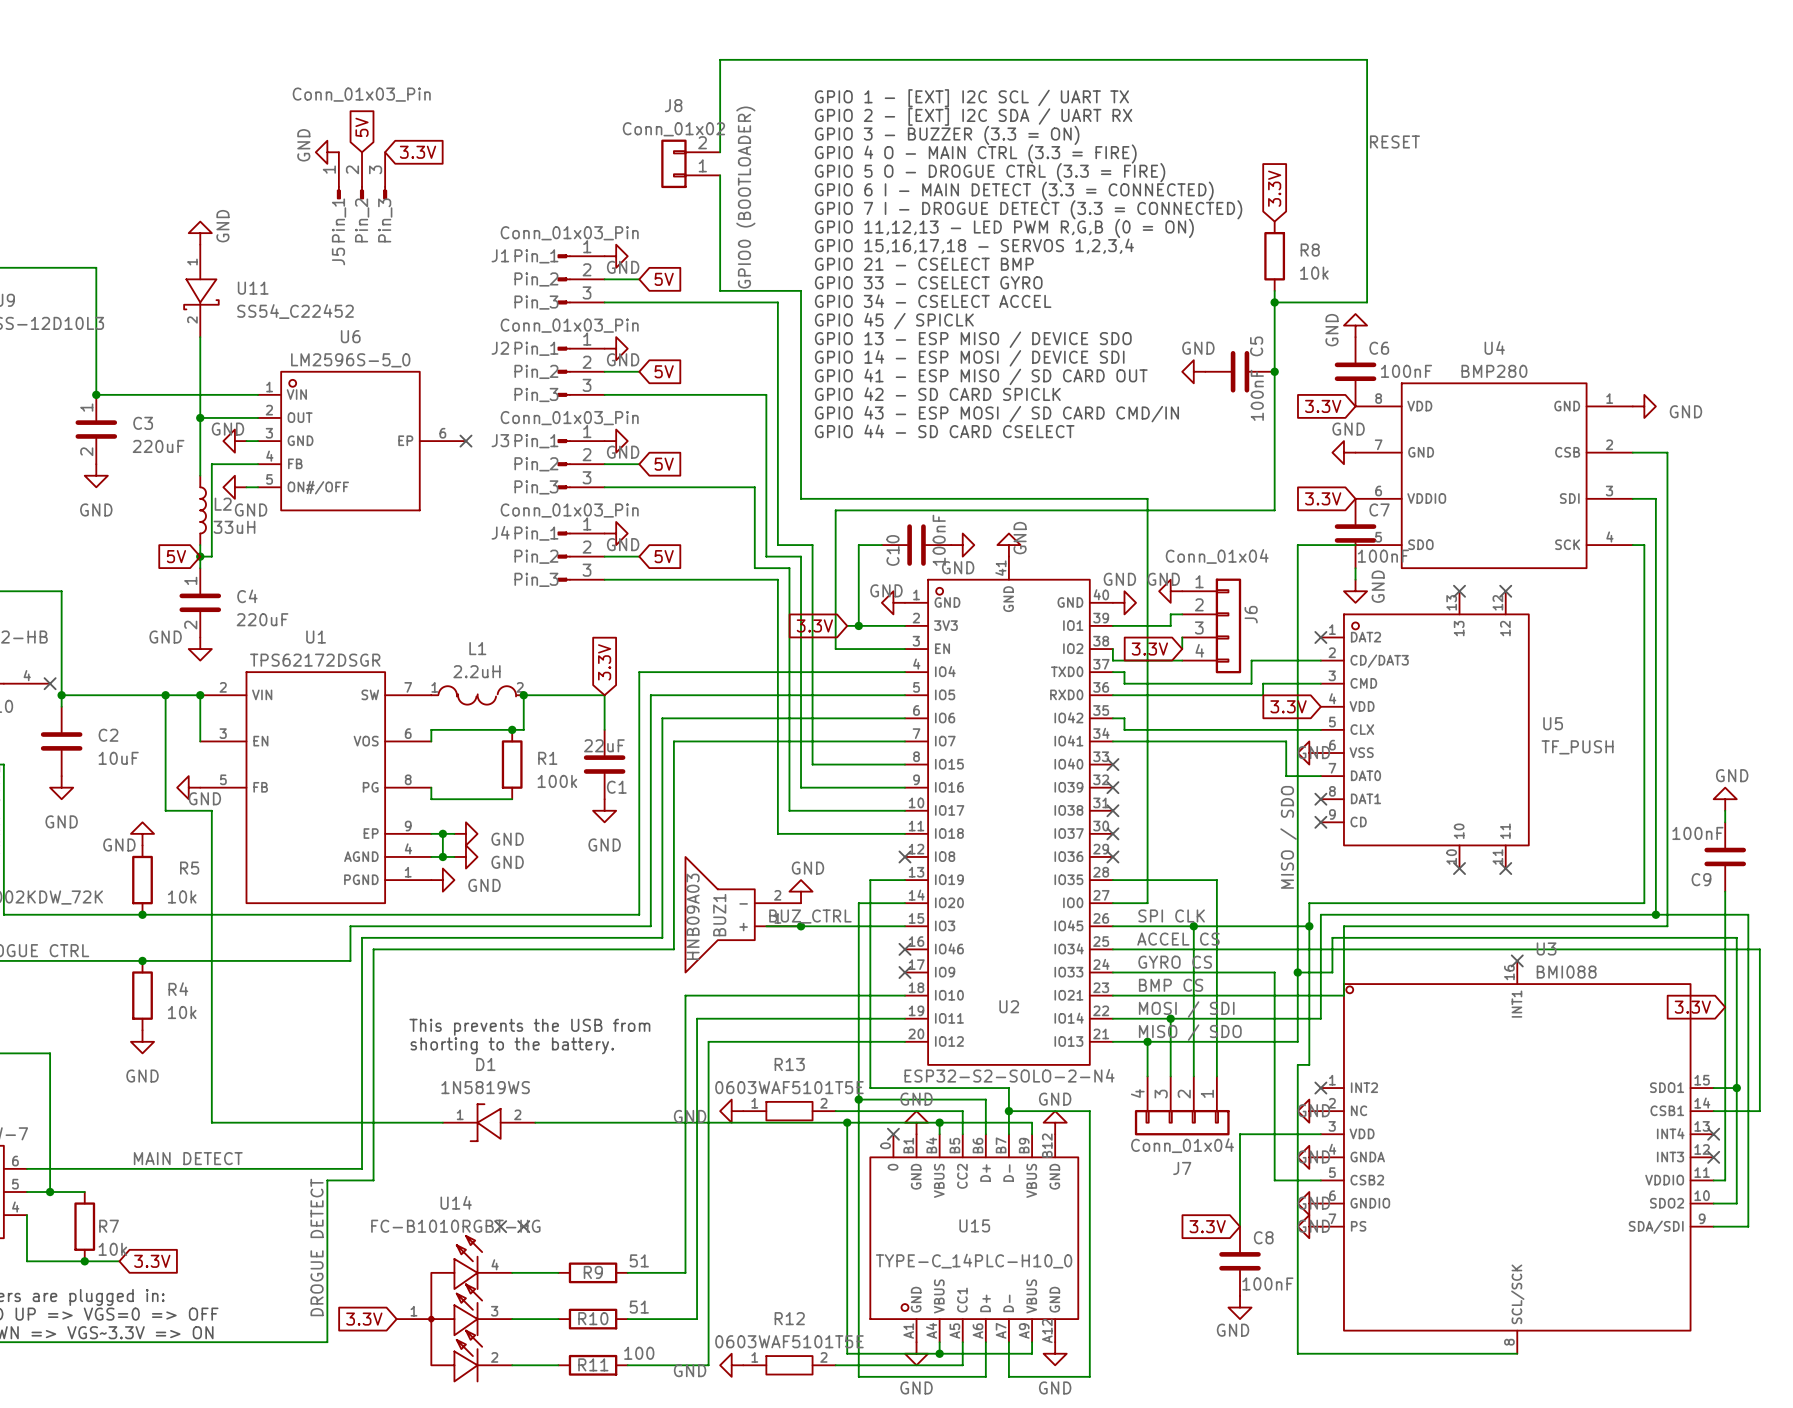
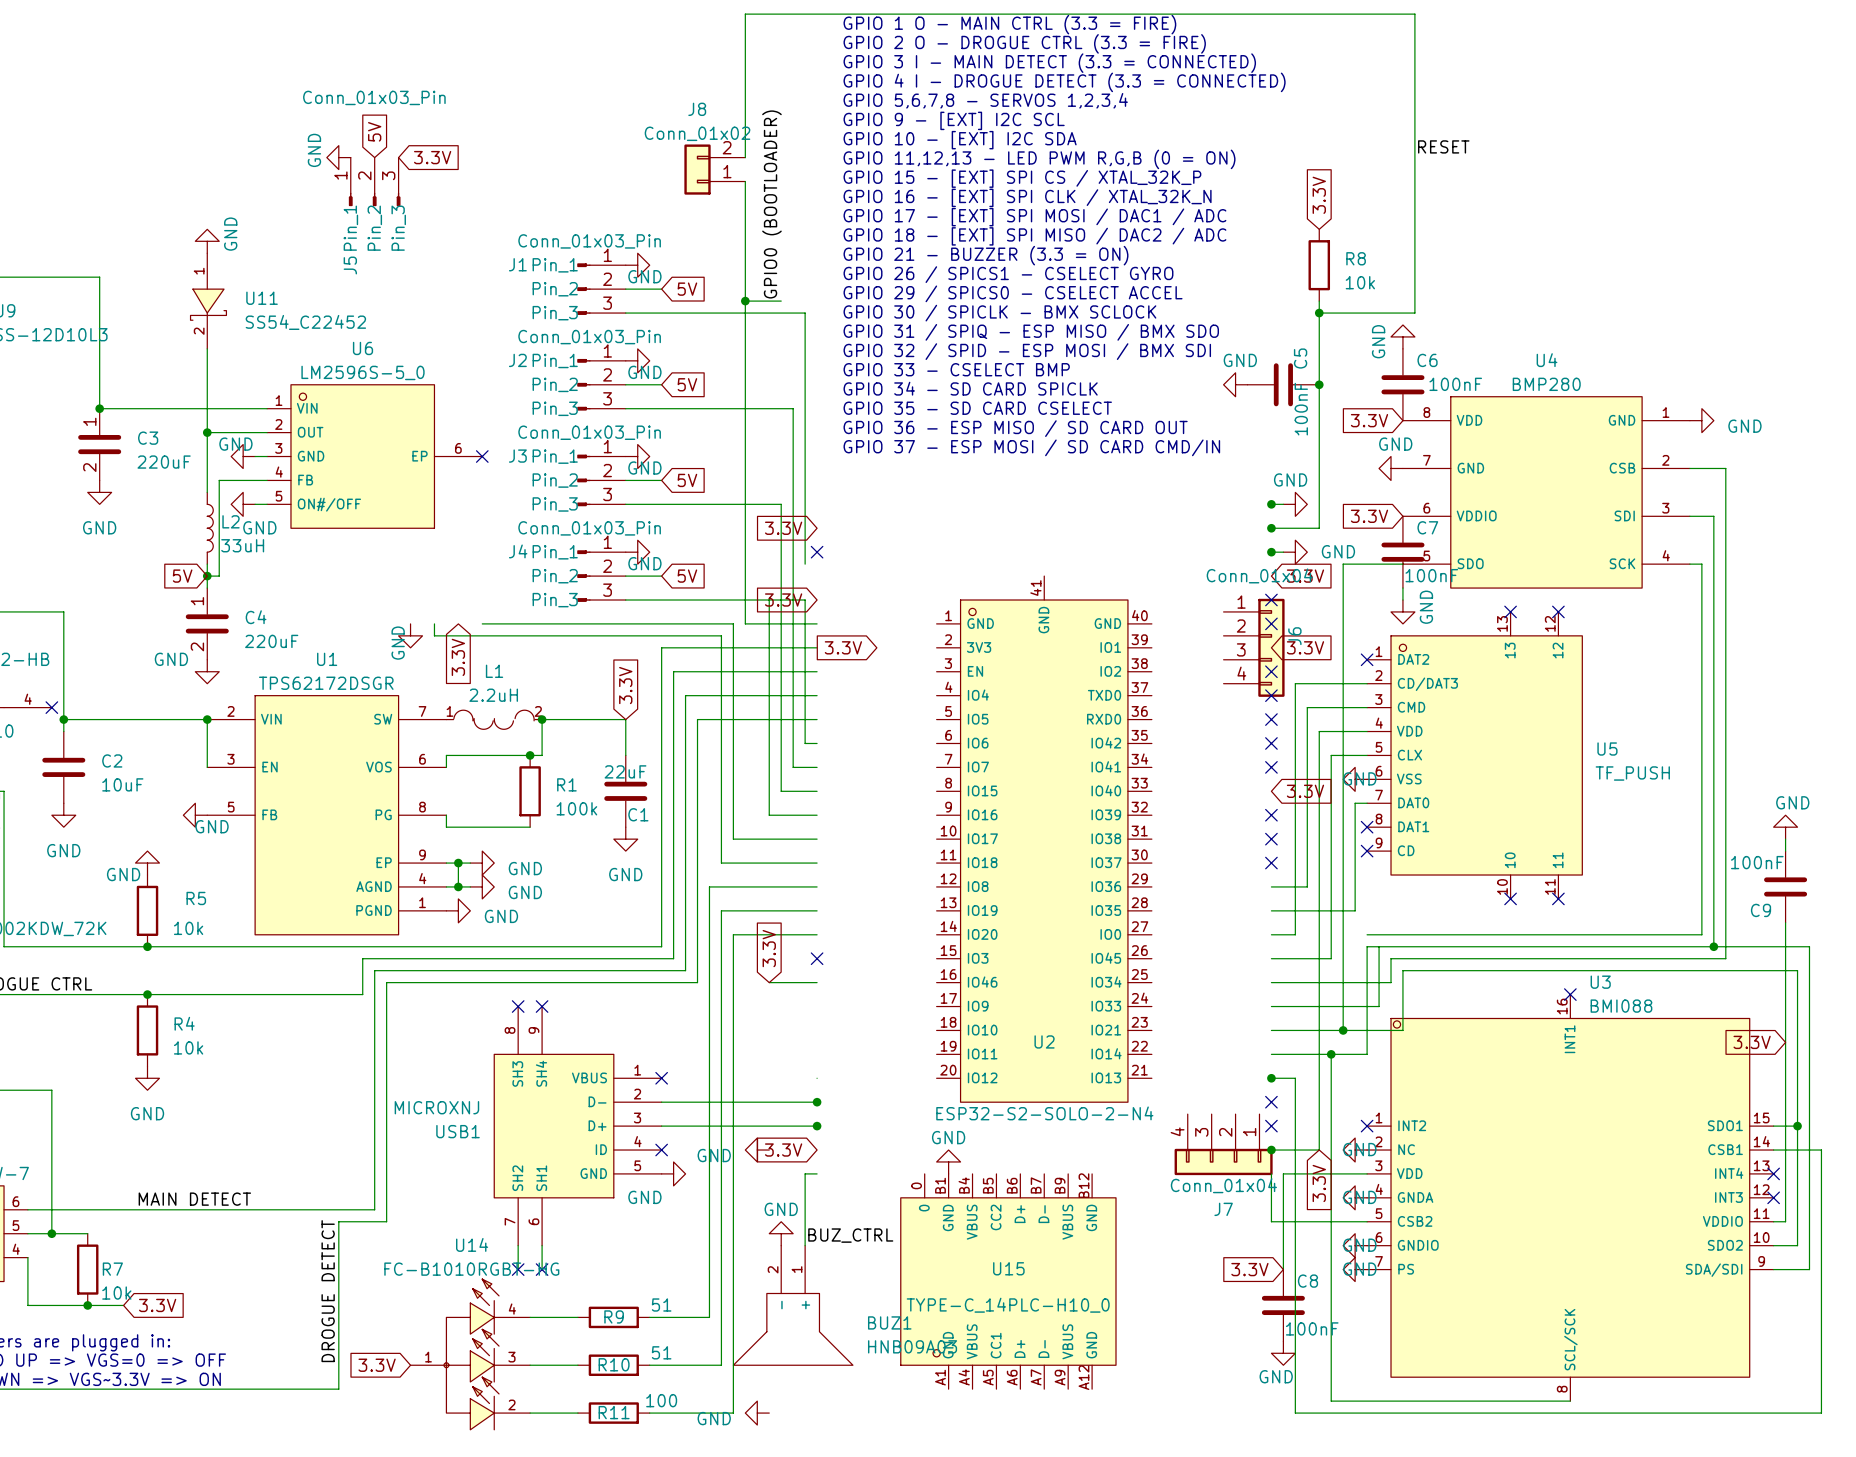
text: none -> GPIO 1 O - MAIN CTRL (3.3 = FIRE) (1009, 24)
text: none -> GPIO 2 O - DROGUE CTRL (3.3 = FIRE) (1024, 43)
wire: (720, 59) (1367, 59) -> (745, 61) (745, 14) (1414, 14) (1414, 61)
text: none -> GPIO 3 I - MAIN DETECT (3.3 = CONNECTED) (1049, 63)
text: none -> GPIO 4 I - DROGUE DETECT (3.3 = CONNECTED) (1064, 82)
text: GPIO 1 - [EXT] I2C SCL / UART TX (971, 98) -> GPIO 5,6,7,8 - SERVOS 1,2,3,4 (985, 100)
text: GPIO 2 - [EXT] I2C SDA / UART RX (973, 116) -> GPIO 9 - [EXT] I2C SCL (954, 120)
text: GPIO 3 - BUZZER (3.3 = ON) (947, 135) -> GPIO 10 - [EXT] I2C SDA (960, 140)
text: GPIO 4 O - MAIN CTRL (3.3 = FIRE) (975, 154) -> GPIO 11,12,13 - LED PWM R,G,B (0 = ON) (1039, 159)
text: GPIO 5 O - DROGUE CTRL (3.3 = FIRE) (990, 172) -> GPIO 15 - [EXT] SPI CS / XTAL_32K_P (1022, 178)
text: GPIO 6 I - MAIN DETECT (3.3 = CONNECTED) (1014, 191) -> GPIO 16 - [EXT] SPI CLK / XTAL_32K_N (1027, 197)
text: GPIO 7 I - DROGUE DETECT (3.3 = CONNECTED) (1028, 209) -> GPIO 17 - [EXT] SPI MOSI / DAC1 / ADC (1034, 217)
text: GPIO 11,12,13 - LED PWM R,G,B (0 = ON) (1004, 228) -> GPIO 18 - [EXT] SPI MISO / DAC2 / ADC (1034, 236)
text: GPIO 15,16,17,18 - SERVOS 1,2,3,4 (974, 246) -> GPIO 21 - BUZZER (3.3 = ON) (985, 255)
text: GPIO 21 - CSELECT BMP (924, 264) -> GPIO 26 / SPICS1 - CSELECT GYRO (1008, 274)
text: GPIO 33 - CSELECT GYRO (928, 282) -> GPIO 29 / SPICS0 - CSELECT ACCEL (1013, 293)
wire: none -> (745, 301) (745, 623) (817, 623)
junction: none -> (745, 301)
wire: (754, 290) (801, 290) (801, 498) (1147, 498) (1147, 903) (1112, 903) -> none
text: GPIO 34 - CSELECT ACCEL (933, 301) -> GPIO 30 / SPICLK - BMX SCLOCK (999, 313)
text: GPIO 45 / SPICLK (894, 321) -> GPIO 31 / SPIQ - ESP MISO / BMX SDO (1031, 332)
text: GPIO 13 - ESP MISO / DEVICE SDO (973, 339) -> GPIO 32 / SPID - ESP MOSI / BMX SDI (1027, 351)
text: GPIO 14 - ESP MOSI / DEVICE SDI (969, 358) -> GPIO 33 - CSELECT BMP (956, 369)
text: GPIO 41 - ESP MISO / SD CARD OUT (981, 376) -> GPIO 34 - SD CARD SPICLK (970, 388)
text: GPIO 42 - SD CARD SPICLK (937, 394) -> GPIO 35 - SD CARD CSELECT (977, 408)
text: GPIO 43 - ESP MOSI / SD CARD CMD/IN (996, 414) -> GPIO 36 - ESP MISO / SD CARD OUT (1015, 428)
text: GPIO 44 - SD CARD CSELECT (944, 431) -> GPIO 37 - ESP MOSI / SD CARD CMD/IN (1031, 447)
wire: none -> (1271, 504) (1283, 504)
junction: none -> (1271, 504)
power symbol: none -> GND (1295, 504)
global label: none -> 3.3V (783, 528)
wire: (1228, 510) (835, 510) (835, 649) (904, 649) -> none
junction: none -> (1271, 528)
no-connect mark: none -> (817, 552)
wire: none -> (1271, 552) (1283, 552)
junction: none -> (1271, 552)
power symbol: none -> GND (1295, 552)
wire: (777, 545) (812, 545) (812, 764) (904, 764) -> none
wire: (881, 545) (858, 545) (858, 625) -> none
C10: 100nF (916, 545) -> none
power symbol: GND (962, 545) -> none
power symbol: GND (1008, 545) -> none
wire: (766, 556) (801, 556) (801, 787) (904, 787) -> (793, 576) (793, 767)
global label: none -> 3.3V (1305, 576)
wire: (754, 568) (789, 568) (789, 810) (904, 810) -> (781, 588) (781, 791) (817, 791)
wire: none -> (769, 600) (769, 815) (817, 815)
global label: none -> 3.3V (783, 600)
no-connect mark: none -> (1271, 600)
power symbol: GND (1170, 591) -> none
wire: none -> (482, 623) (733, 623) (733, 839) (817, 839)
power symbol: GND (893, 602) -> none
power symbol: GND (1124, 602) -> none
no-connect mark: none -> (1271, 623)
power symbol: none -> GND (410, 635)
wire: (1182, 614) (1170, 614) (1170, 625) (1112, 625) -> none
wire: none -> (817, 647) (661, 647) (661, 695)
wire: (847, 625) (904, 625) -> none
junction: (858, 625) -> none
global label: none -> 3.3V (1305, 647)
global label: none -> 3.3V (458, 657)
wire: (1182, 637) (1182, 649) -> none
wire: none -> (817, 671) (673, 671) (673, 719)
wire: (1112, 649) (1112, 660) (1182, 660) -> none
global label: 3.3V (1149, 649) -> none
no-connect mark: none -> (1271, 671)
wire: (639, 672) (662, 672) -> (685, 743) (685, 695)
wire: (789, 672) (904, 672) -> none
wire: (1112, 672) (1124, 672) (1124, 683) (1251, 683) -> (1271, 934) (1295, 934) (1295, 707)
no-connect mark: none -> (1271, 695)
wire: (165, 695) (165, 810) (211, 810) (211, 1122) (442, 1122) -> none
junction: (165, 695) -> none
wire: (650, 695) (673, 695) -> (697, 767) (697, 719)
wire: (789, 695) (904, 695) -> none
wire: (1112, 695) (1263, 695) -> (1271, 886) (1307, 886) (1307, 719)
no-connect mark: none -> (1271, 719)
global label: 3.3V (1288, 706) -> none
wire: none -> (1367, 731) (1319, 731) (1319, 1006) (1343, 1006)
wire: (662, 718) (777, 718) (777, 833) -> (434, 623) (434, 635) (721, 635) (721, 863) (805, 863)
wire: (789, 718) (904, 718) -> none
wire: (1112, 718) (1124, 718) (1124, 729) (1286, 729) -> none
no-connect mark: none -> (1271, 743)
wire: (673, 741) (766, 741) -> none
wire: (789, 741) (904, 741) -> none
wire: (1112, 741) (1286, 741) -> (1331, 755) (1331, 767)
no-connect mark: none -> (1271, 767)
no-connect mark: (1112, 764) -> none
global label: none -> 3.3V (1305, 791)
wire: (1286, 776) (1309, 776) -> (1271, 910) (1355, 910) (1355, 803)
no-connect mark: (1112, 787) -> none
no-connect mark: none -> (1271, 815)
no-connect mark: (1112, 810) -> none
no-connect mark: none -> (1271, 839)
wire: (789, 833) (904, 833) -> none
no-connect mark: (1112, 833) -> none
no-connect mark: none -> (1271, 863)
label: MISO / SDO (1288, 837) -> none
no-connect mark: (904, 856) -> none
no-connect mark: (1112, 856) -> none
wire: (904, 880) (870, 880) (870, 1088) (1008, 1088) (1008, 1134) -> none
wire: (1112, 880) (1216, 880) (1216, 1076) -> none
power symbol: GND (801, 891) -> none
wire: (904, 903) (858, 903) (858, 1376) (985, 1376) (985, 1342) -> none
wire: (1320, 903) (1309, 903) (1309, 1064) (1297, 1064) (1297, 1353) -> (1331, 1054) (1331, 1401) (1343, 1401)
BUZ1 rotation: 0° (720, 914) -> 90° counterclockwise (793, 1329)
BUZ1 position: (743, 914) -> (793, 1305)
BUZ1 name position: BUZ1 (719, 915) -> BUZ1 (889, 1322)
label: SPI CLK (1171, 915) -> none
BUZ1 value position: HNB09A03 (693, 916) -> HNB09A03 (912, 1346)
global label: none -> 3.3V (769, 948)
label: BUZ_CTRL (810, 916) -> none
wire: (766, 926) (904, 926) -> none
no-connect mark: none -> (817, 958)
junction: (801, 926) -> none
wire: (1112, 926) (1228, 926) -> none
wire: (1193, 926) (1193, 1076) -> none
junction: (1193, 926) -> none
wire: (1286, 926) (1309, 926) -> (1331, 958) (1331, 803)
junction: (1309, 926) -> none
wire: (1332, 937) (1355, 937) -> (1379, 970) (1379, 946)
wire: none -> (1402, 970) (1402, 1030) (1391, 1030)
label: ACCEL CS (1178, 939) -> none
wire: none -> (769, 982) (817, 982)
no-connect mark: (904, 949) -> none
wire: (1112, 949) (1228, 949) -> none
label: GYRO CS (1175, 962) -> none
no-connect mark: none -> (518, 1006)
no-connect mark: none -> (542, 1006)
no-connect mark: (904, 972) -> none
wire: (1112, 972) (1228, 972) -> none
junction position: (1297, 972) -> (1343, 1030)
label: BMP CS (1171, 985) -> none
wire: (685, 995) (904, 995) -> (709, 1030) (709, 886) (817, 886)
wire: (1112, 995) (1228, 995) -> none
wire: (1297, 995) (1297, 1041) (1251, 1041) -> none
wire: (1343, 995) (1343, 949) (1759, 949) (1759, 1111) -> (1295, 1078) (1295, 1413) (1821, 1413) (1821, 1150)
label: MOSI / SDI (1186, 1009) -> none
wire: (697, 1018) (904, 1018) -> (721, 1054) (721, 910) (817, 910)
wire: (1112, 1018) (1228, 1018) -> none
wire: (1170, 1018) (1170, 1076) -> none
junction: (1170, 1018) -> none
junction: none -> (1331, 1054)
text: This prevents the USB from (529, 1027) -> none
label: MISO / SDO (1190, 1032) -> none
no-connect mark: none -> (661, 1078)
wire: (708, 1041) (904, 1041) -> (733, 1078) (733, 934) (817, 934)
wire: (1112, 1041) (1228, 1041) -> none
wire: (1147, 1041) (1147, 1076) -> none
junction: (1147, 1041) -> none
junction: none -> (1271, 1078)
text: shorting to the battery. (512, 1045) -> none
wire: none -> (661, 1102) (817, 1102)
junction: none -> (817, 1102)
no-connect mark: none -> (1271, 1102)
USB1: none -> MICROXNJ (577, 1126)
wire: none -> (661, 1126) (817, 1126)
junction: none -> (817, 1126)
no-connect mark: none -> (1271, 1126)
wire: (858, 1099) (985, 1099) (985, 1134) -> none
junction: (858, 1099) -> none
no-connect mark: none -> (661, 1150)
global label: none -> 3.3V (783, 1150)
R13: 0603WAF5101T5E (789, 1111) -> none
wire: (835, 1111) (962, 1111) (962, 1134) -> none
wire: (1008, 1111) (1089, 1111) (1089, 1376) (1008, 1376) (1008, 1342) -> none
junction: (1008, 1111) -> none
wire: none -> (1271, 1150) (1319, 1150)
junction: none -> (1271, 1150)
wire: (1274, 1111) (1274, 1180) -> (1271, 1173) (1271, 1221) (1319, 1221)
D1: 1N5819WS (489, 1122) -> none
wire: (535, 1122) (1032, 1122) (1032, 1134) -> none
wire: (847, 1122) (847, 1353) (1032, 1353) (1032, 1342) -> none
junction: (847, 1122) -> none
wire: (939, 1122) (939, 1134) -> none
junction: (939, 1122) -> none
power symbol: GND (1055, 1122) -> none
power symbol: none -> GND (673, 1173)
wire: none -> (817, 1173) (805, 1173) (805, 1245)
no-connect mark: (893, 1134) -> none
global label: none -> 3.3V (1319, 1183)
power symbol: none -> GND (781, 1233)
label: none -> BUZ_CTRL (850, 1235)
wire: none -> (518, 1245) (518, 1269)
wire: none -> (542, 1245) (542, 1269)
wire: (939, 1342) (939, 1353) -> none
wire: (962, 1342) (962, 1365) (835, 1365) -> none
power symbol: GND (916, 1353) -> none
junction: (939, 1353) -> none
power symbol: GND (1055, 1353) -> none
R12: 0603WAF5101T5E (789, 1365) -> none

